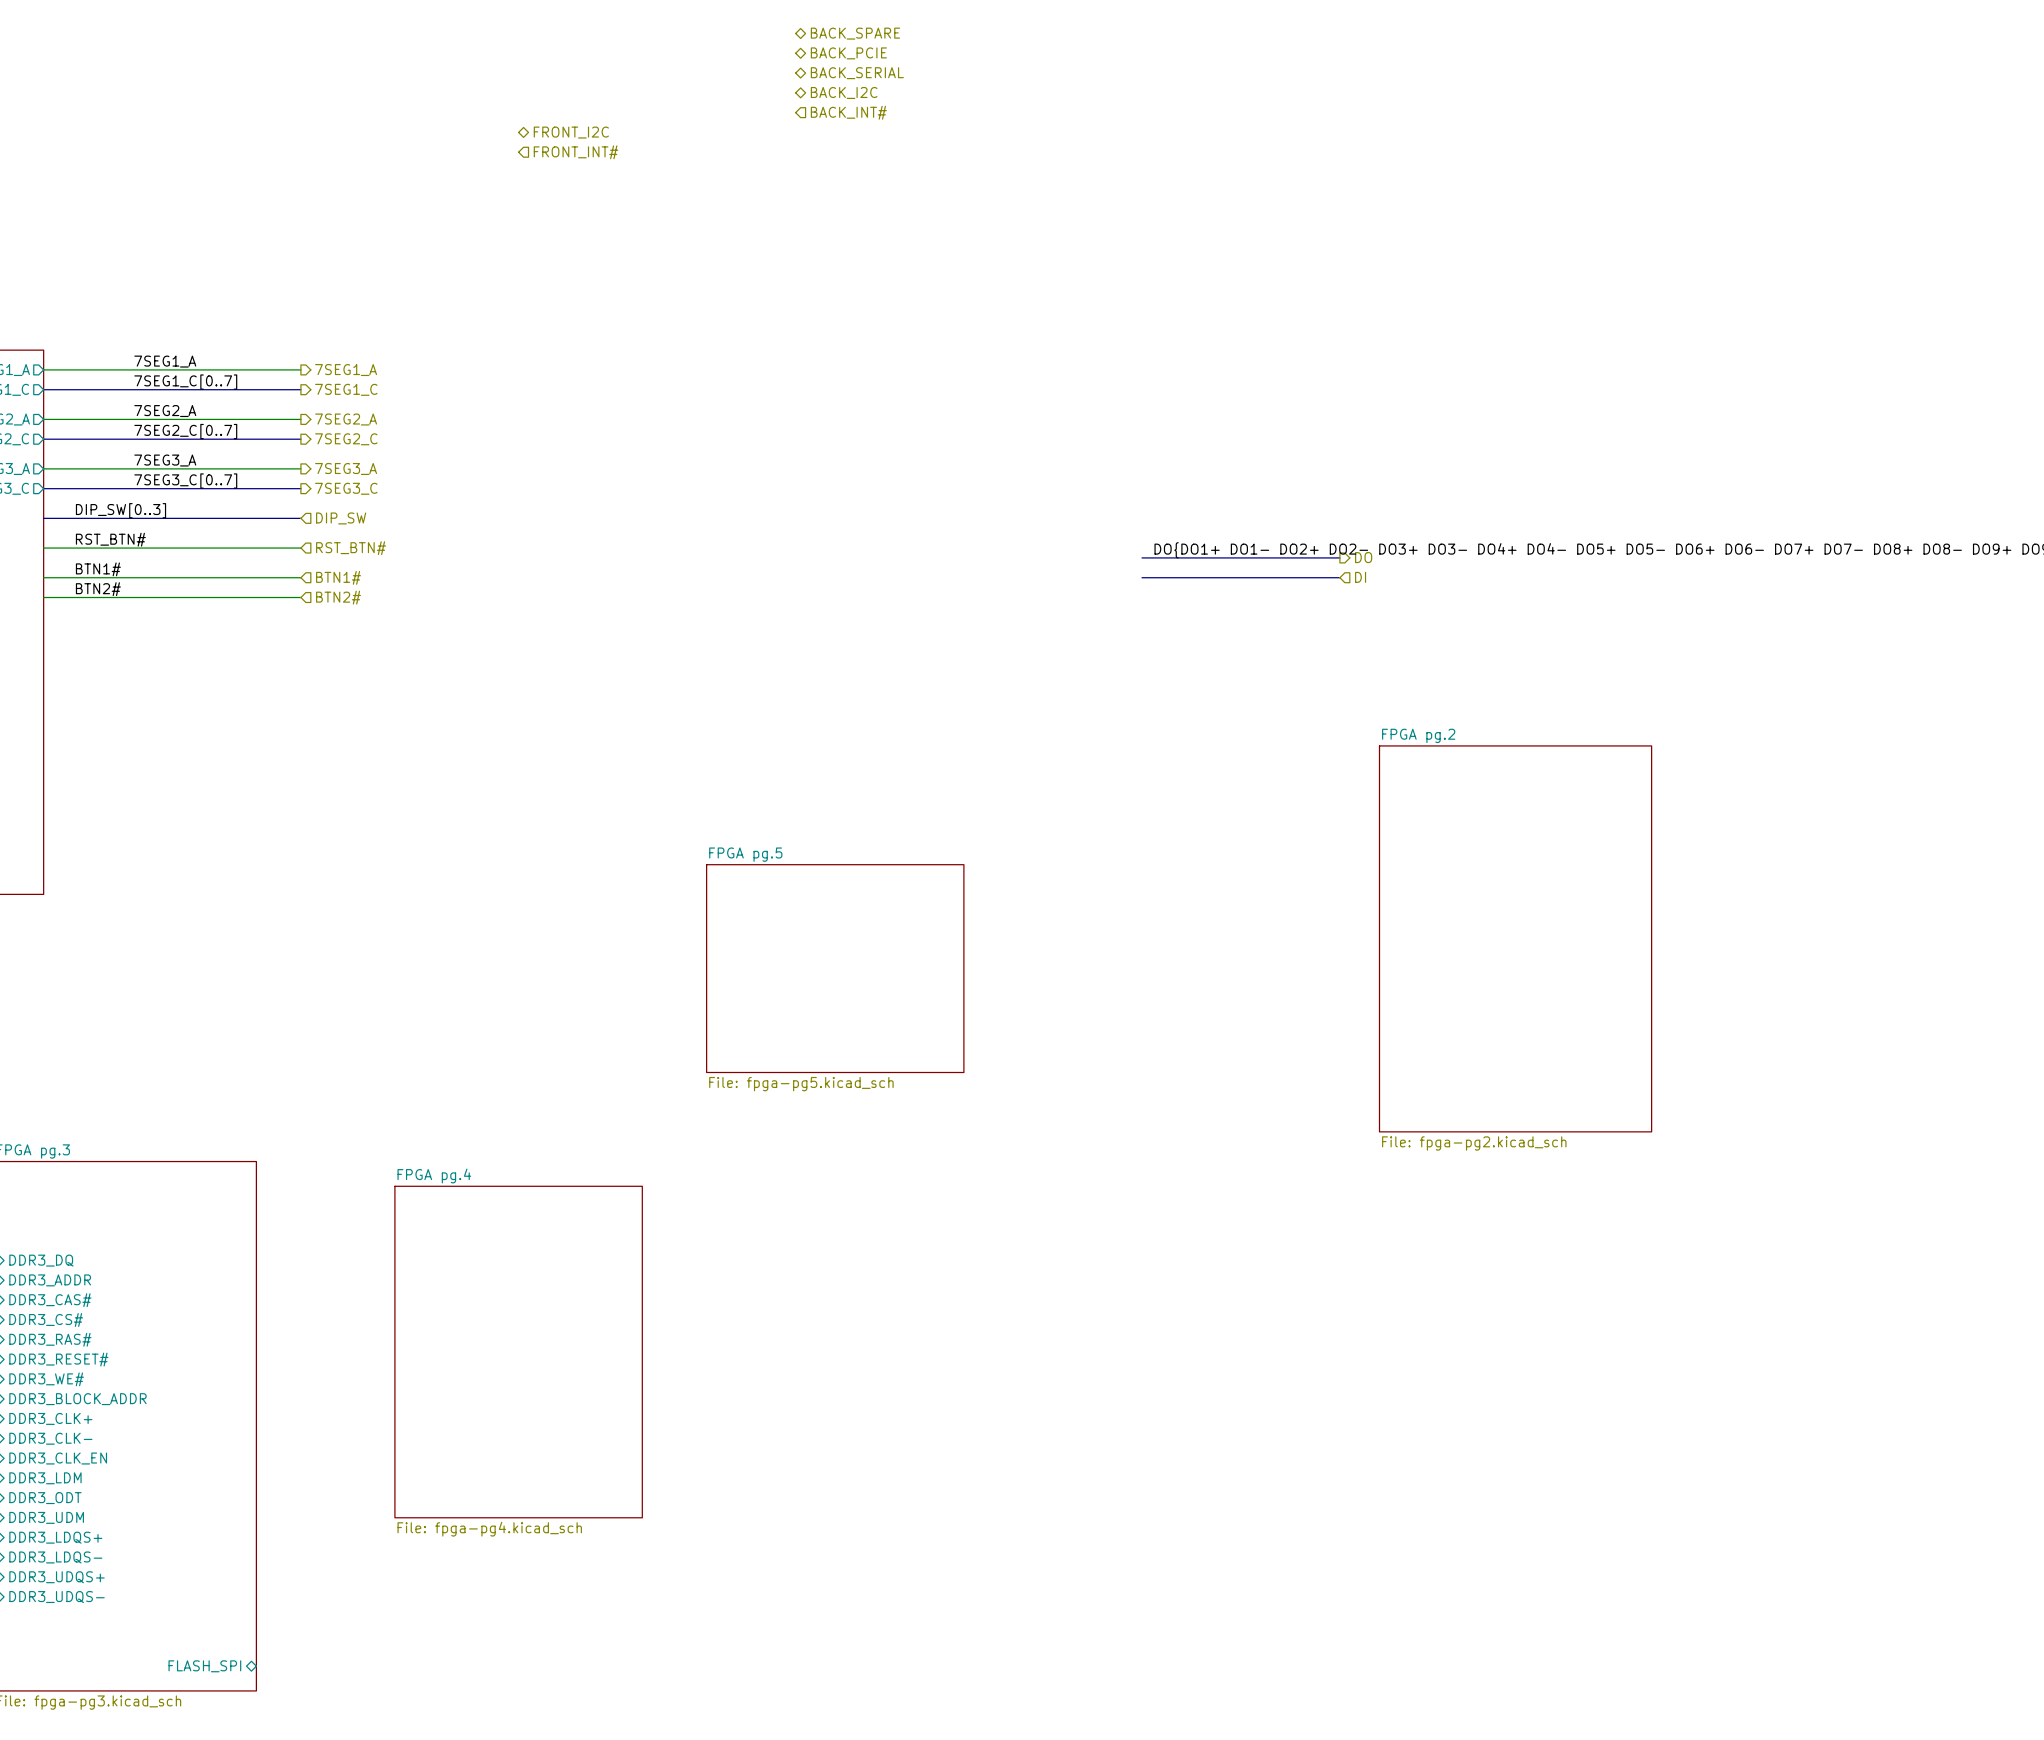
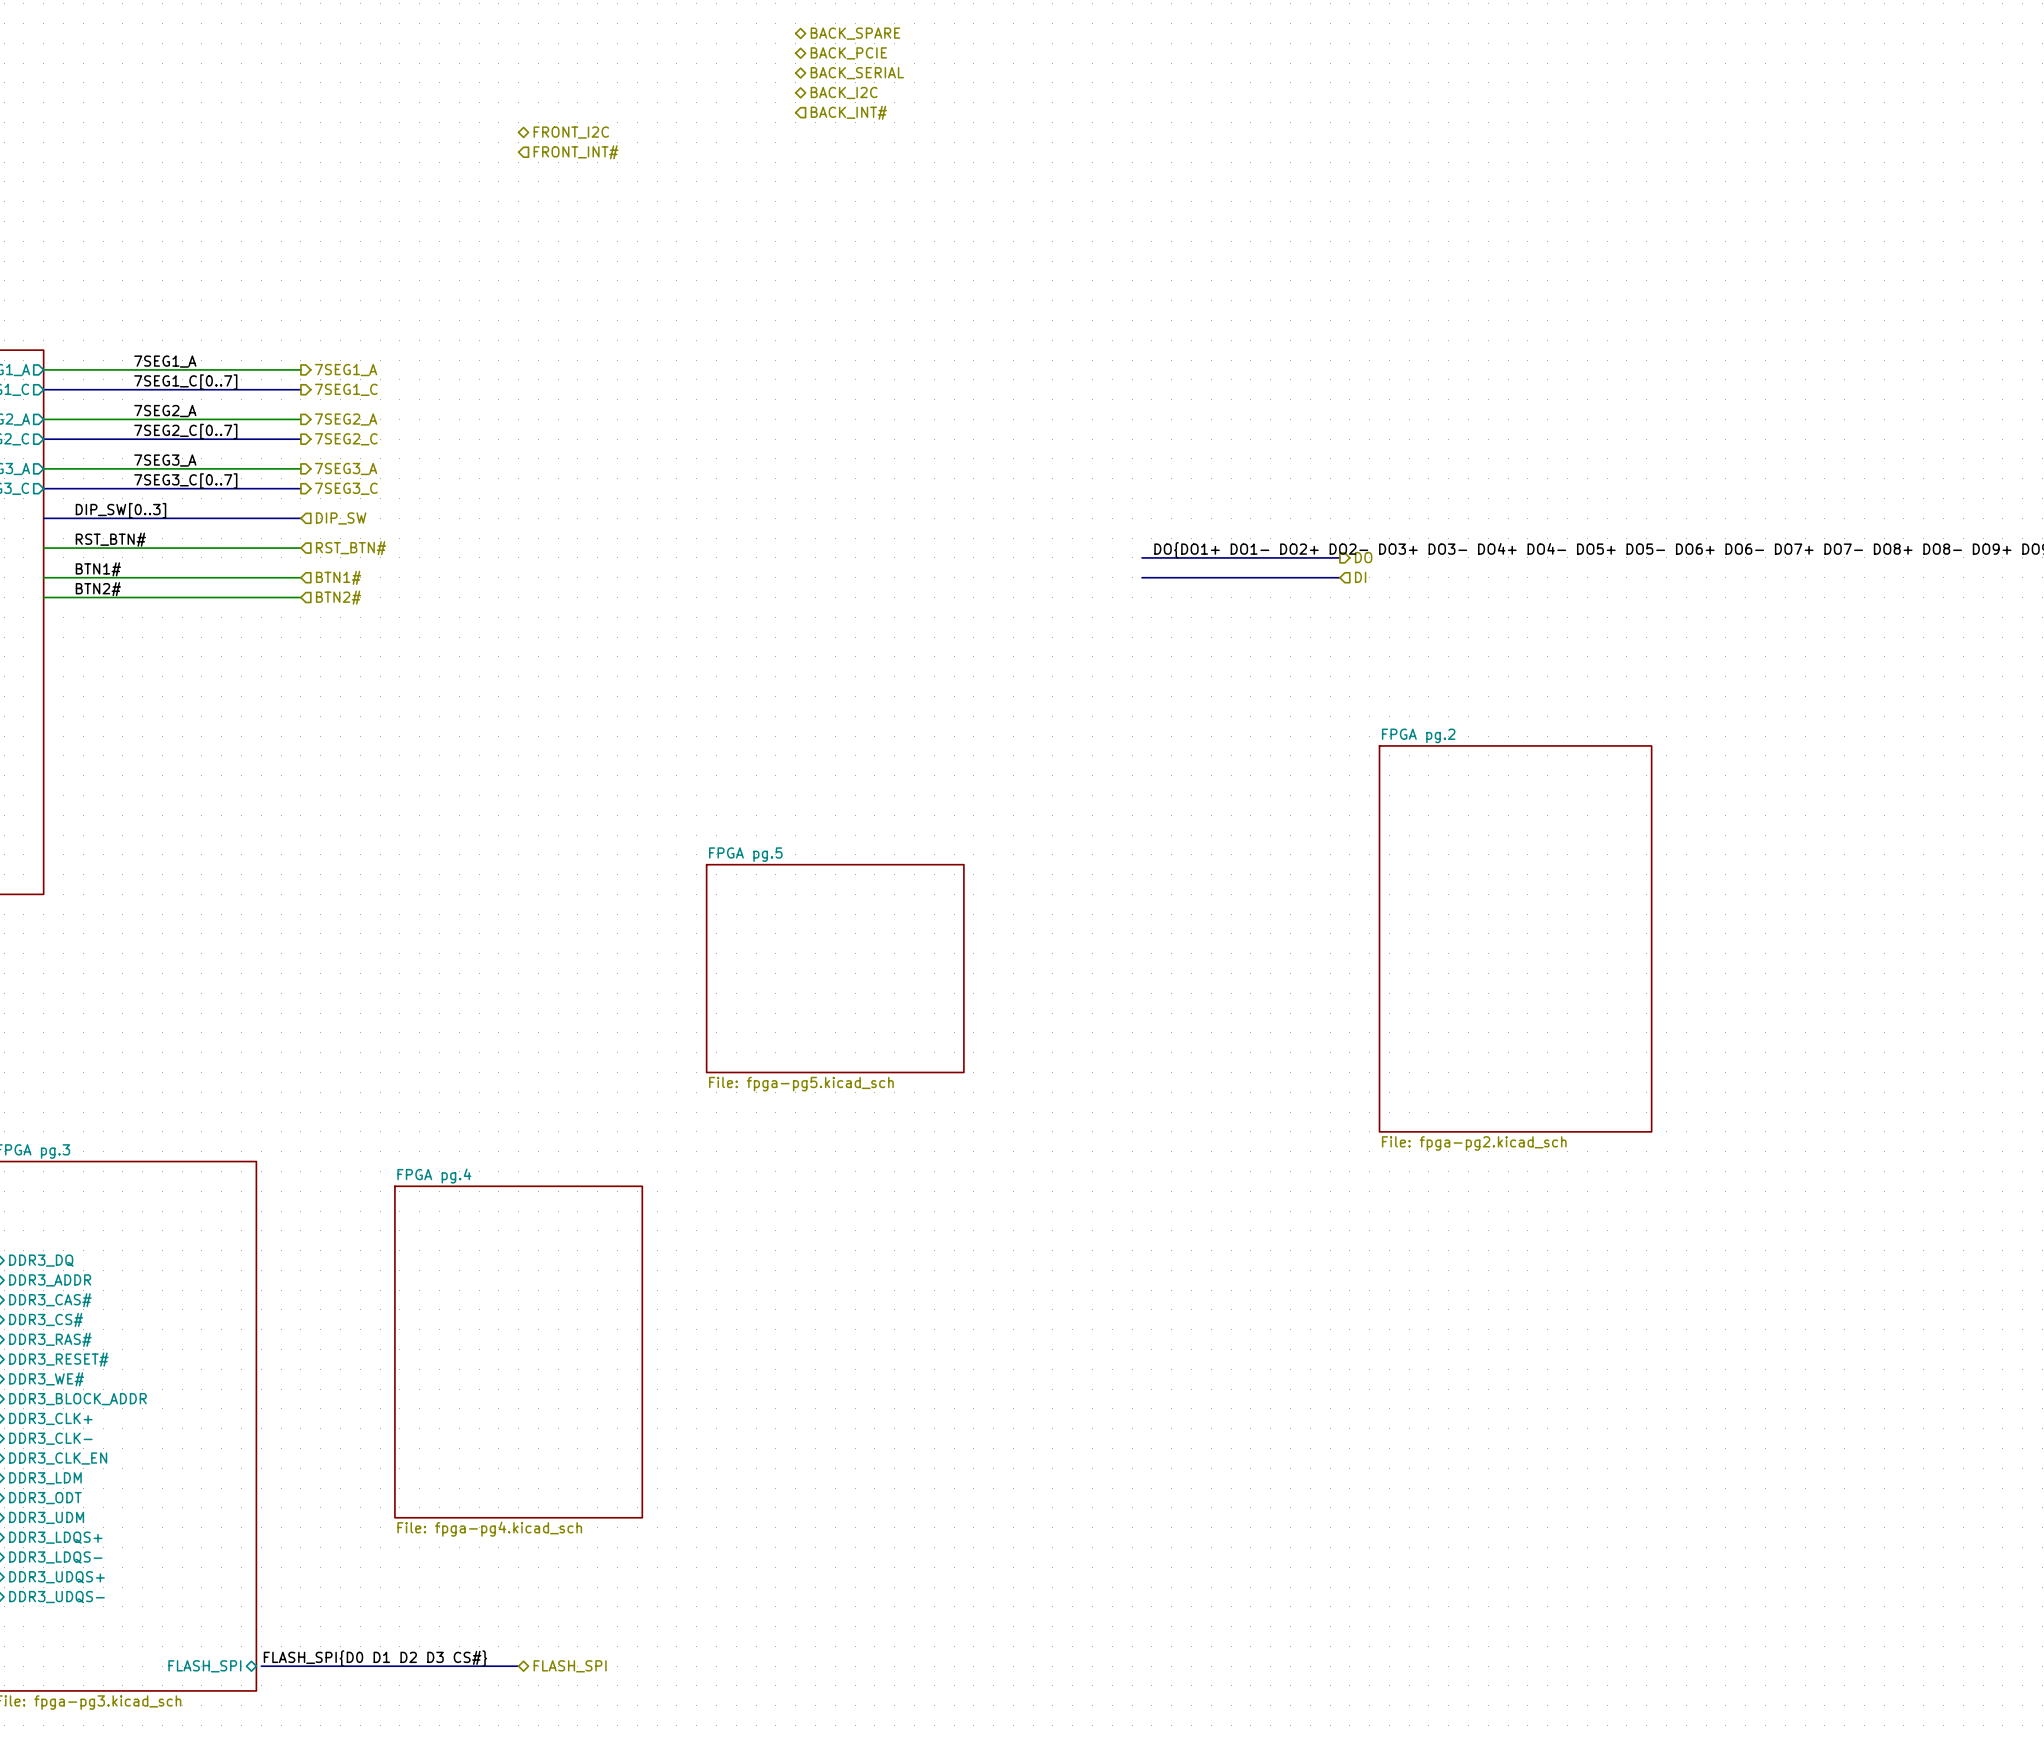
label: none -> FLASH_SPI{D0 D1 D2 D3 CS#} (375, 1658)
bus: none -> (261, 1666) (518, 1666)
hierarchical label: none -> FLASH_SPI (570, 1666)

